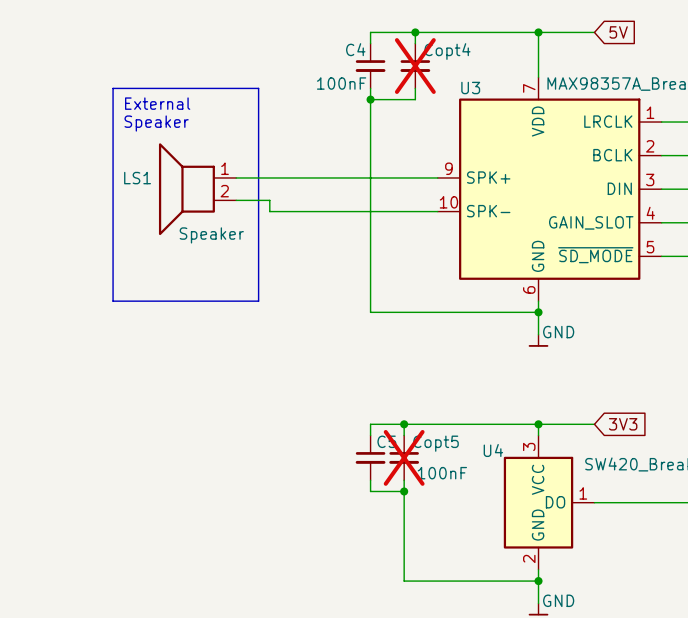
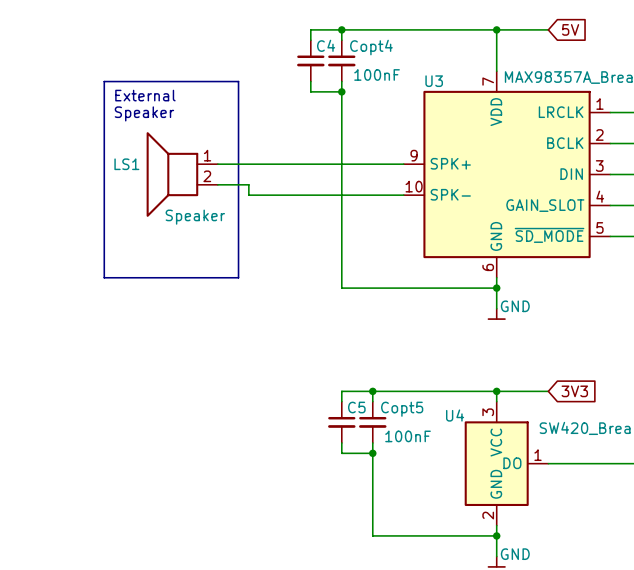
wire: none -> (341, 29) (310, 29) (310, 40)
wire: (415, 32) (415, 43) -> none
junction position: (415, 32) -> (341, 29)
C4 name: C4 (355, 49) -> Copt4 (371, 47)
C4: none -> 100nF (310, 60)
Copt4: (415, 66) -> none
C4 value: 100nF (341, 83) -> none
wire: (415, 88) (415, 99) (370, 99) -> (310, 81) (310, 91) (341, 91)
Copt5 do-not-place cross: (404, 457) -> none

